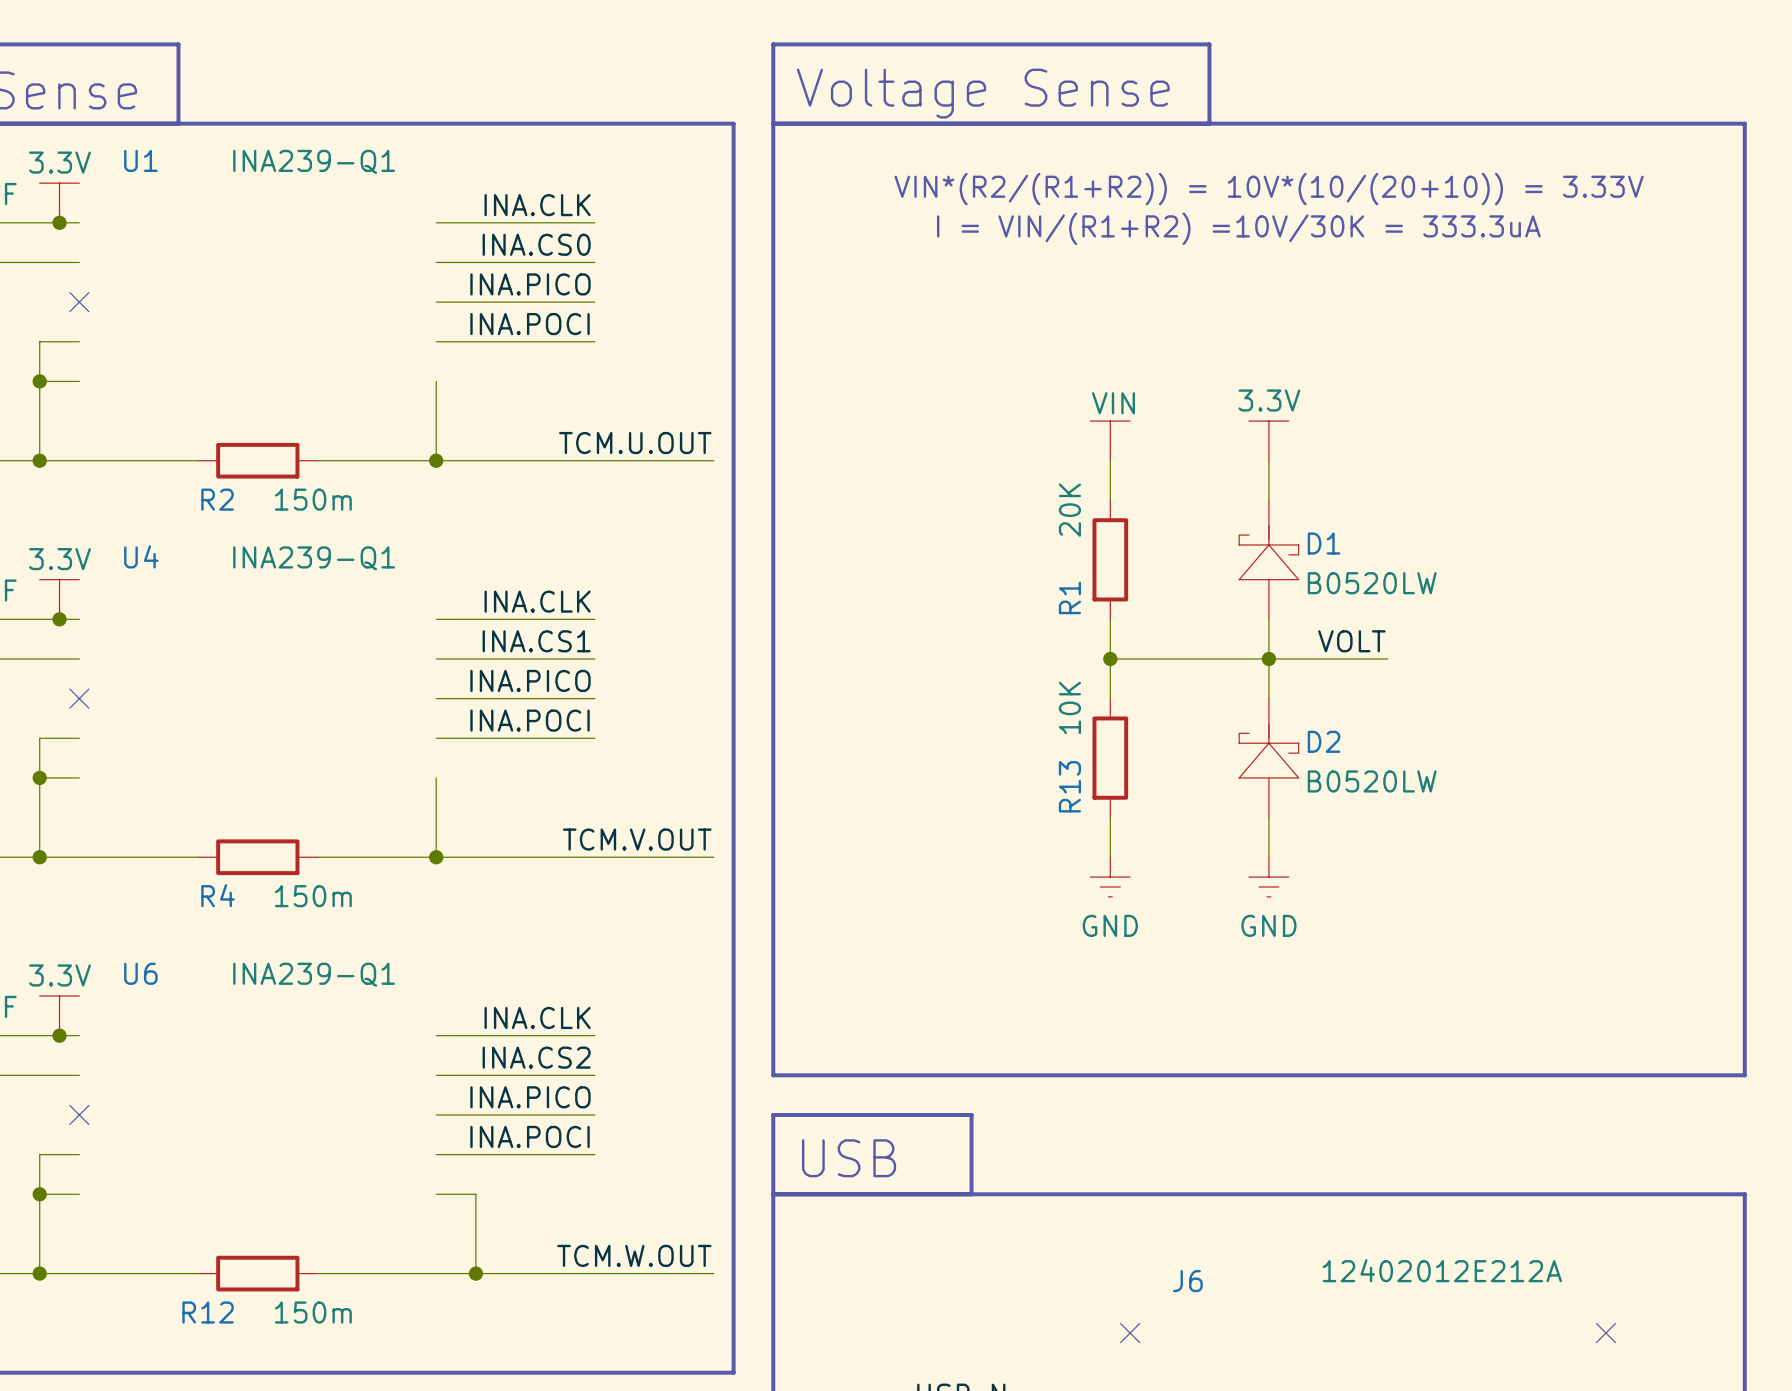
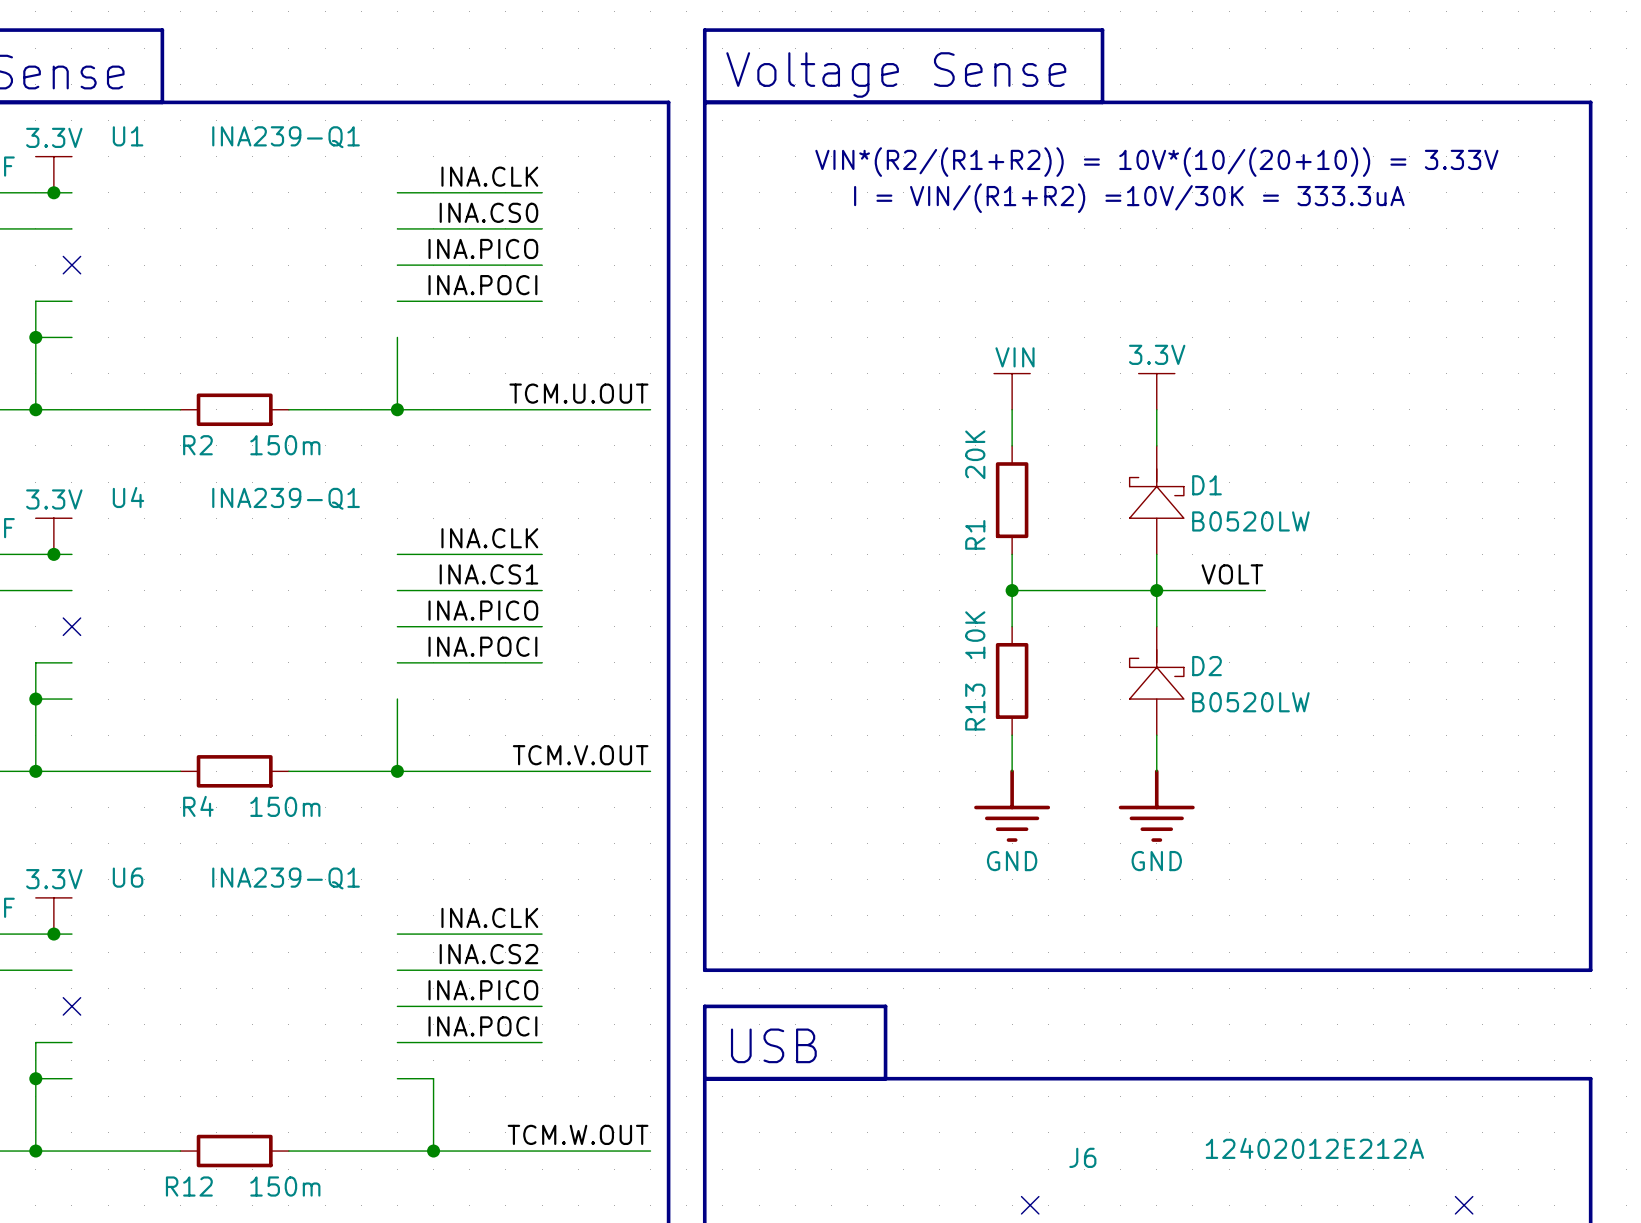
power symbol: GND (1110, 877) -> none
power symbol: GND (1268, 877) -> none
power symbol: none -> GND (1012, 805)
power symbol: none -> GND (1156, 805)

